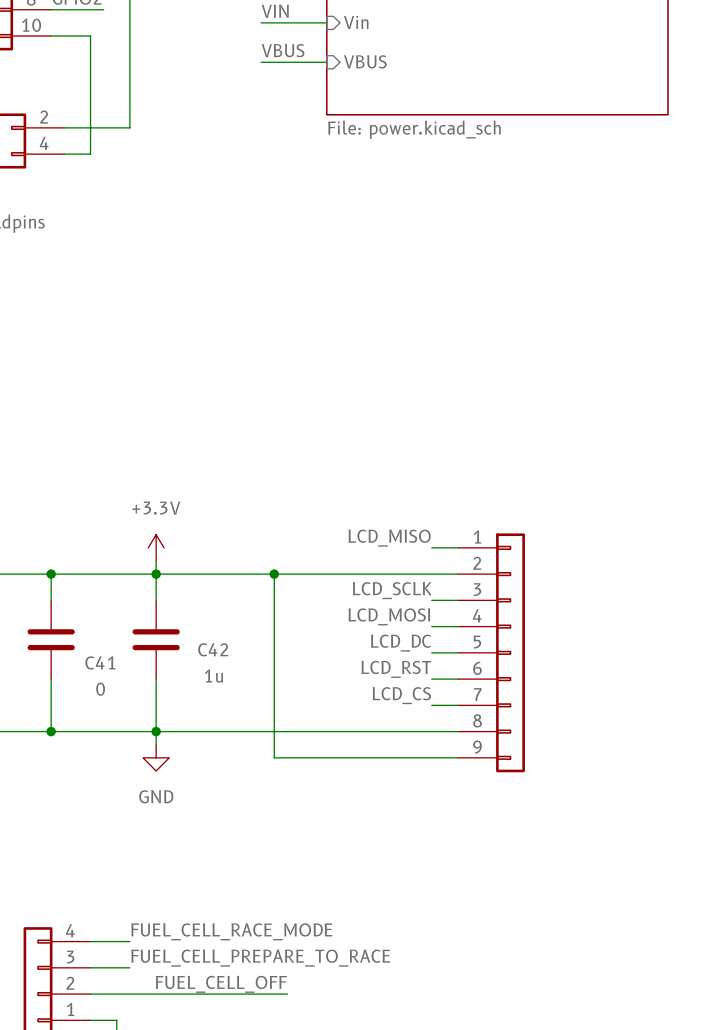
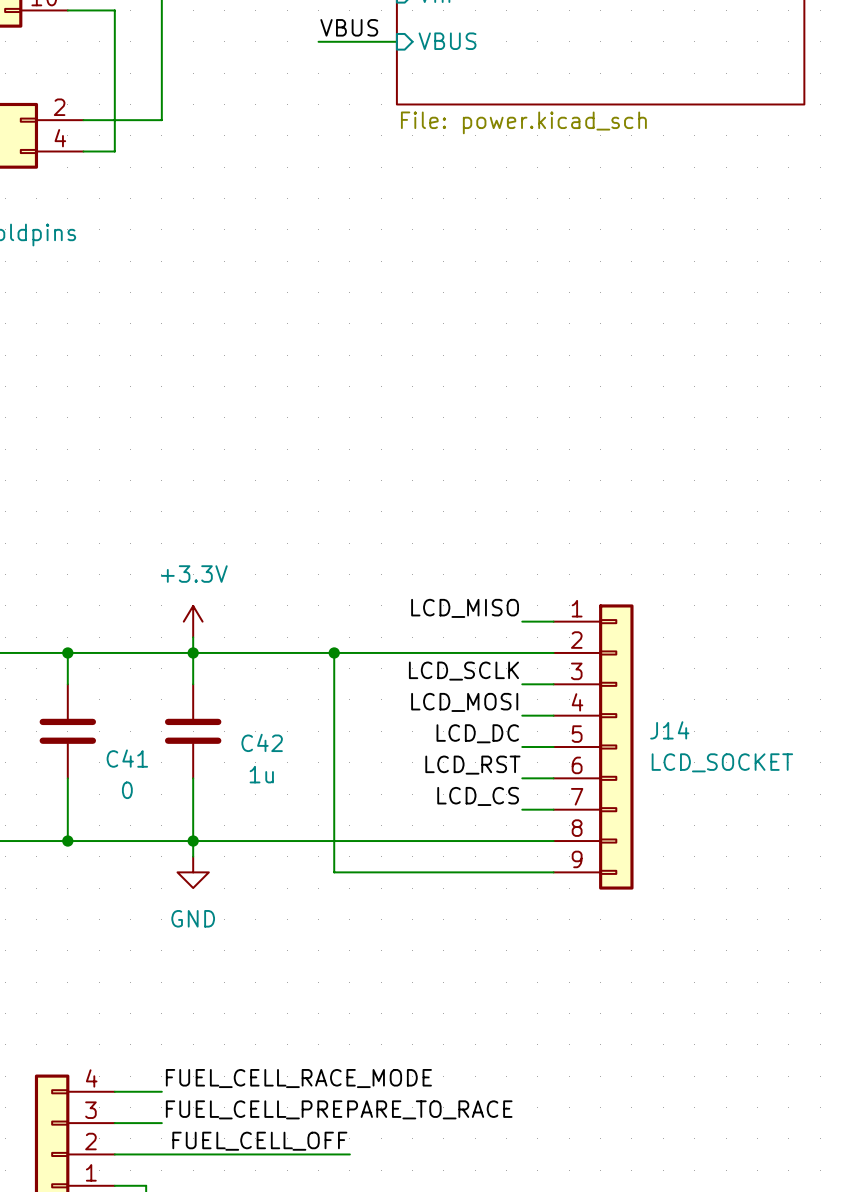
J14 name: none -> J14 (669, 730)
J14 value: none -> LCD_SOCKET (722, 762)

